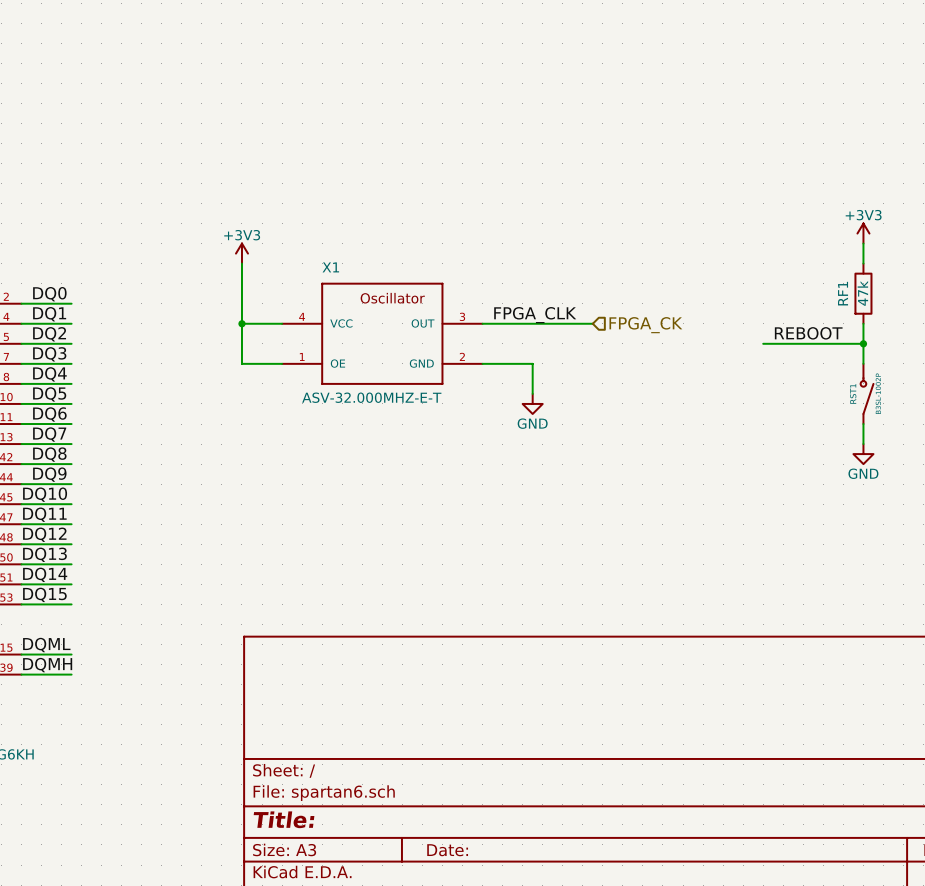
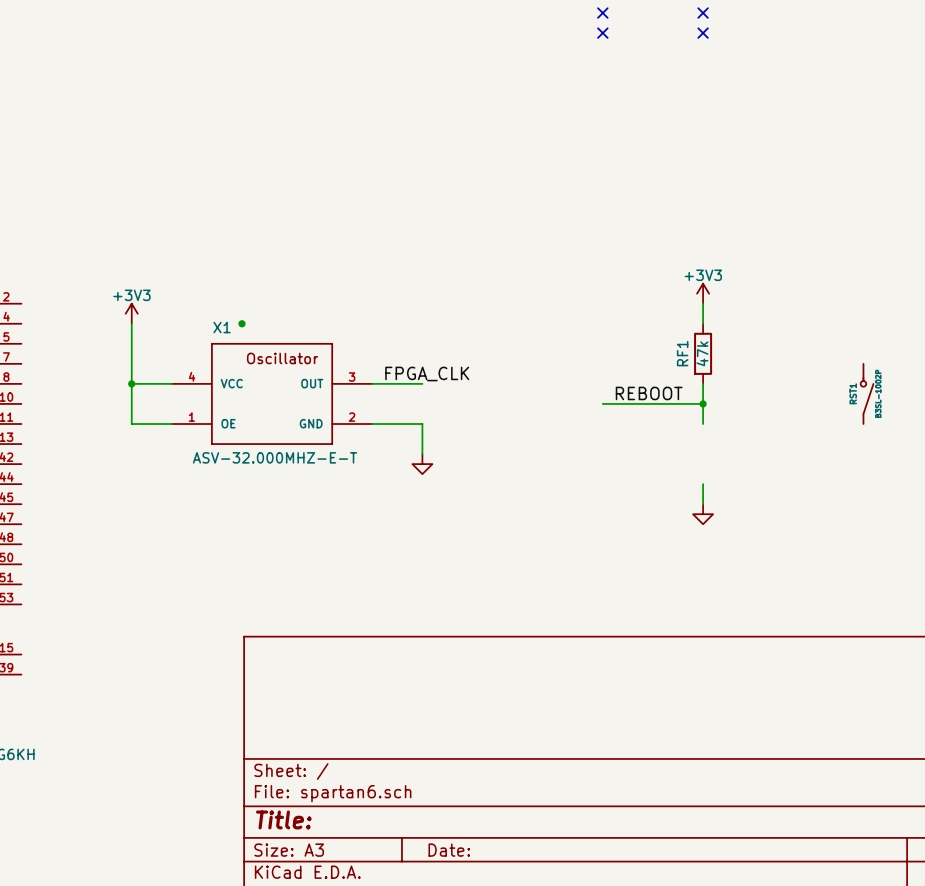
no-connect mark: none -> (602, 13)
no-connect mark: none -> (703, 13)
no-connect mark: none -> (602, 33)
no-connect mark: none -> (703, 33)
power symbol position: +3V3 (863, 233) -> +3V3 (703, 293)
wire: (863, 243) (863, 263) -> (703, 303) (703, 323)
power symbol position: +3V3 (241, 253) -> +3V3 (131, 313)
wire: (241, 263) (241, 363) (282, 363) -> (131, 323) (131, 424) (171, 424)
RF1 position: (863, 293) -> (703, 353)
label: DQ0 (49, 294) -> none
wire: (21, 303) (71, 303) -> none
label: DQ1 (49, 314) -> none
label position: FPGA_CLK (535, 315) -> FPGA_CLK (427, 373)
wire: (21, 323) (71, 323) -> none
wire: (241, 323) (282, 323) -> (131, 383) (171, 383)
wire: (482, 323) (592, 323) -> none
wire: (863, 323) (863, 363) -> (703, 383) (703, 424)
hierarchical label: FPGA_CK (645, 325) -> none
X1 position: (382, 333) -> (272, 393)
label position: REBOOT (808, 333) -> REBOOT (649, 393)
label: DQ2 (49, 334) -> none
wire: (21, 343) (71, 343) -> none
wire: (763, 343) (863, 343) -> (602, 403) (703, 403)
junction: (863, 343) -> none
label: DQ3 (49, 354) -> none
wire: (21, 363) (71, 363) -> none
wire: (482, 363) (532, 363) (532, 393) -> (372, 424) (422, 424) (422, 454)
label: DQ4 (49, 374) -> none
wire: (21, 383) (71, 383) -> none
junction: none -> (131, 383)
label: DQ5 (49, 394) -> none
wire: (21, 403) (71, 403) -> none
power symbol: GND (532, 403) -> none
junction: none -> (703, 403)
label: DQ6 (49, 414) -> none
wire: (21, 424) (71, 424) -> none
wire: (863, 424) (863, 444) -> (703, 484) (703, 504)
label: DQ7 (49, 434) -> none
wire: (21, 444) (71, 444) -> none
label: DQ8 (49, 454) -> none
power symbol: GND (863, 454) -> none
wire: (21, 464) (71, 464) -> none
power symbol: none -> (422, 464)
label: DQ9 (49, 474) -> none
wire: (21, 484) (71, 484) -> none
label: DQ10 (45, 494) -> none
wire: (21, 504) (71, 504) -> none
label: DQ11 (44, 514) -> none
power symbol: none -> (703, 514)
wire: (21, 524) (71, 524) -> none
label: DQ12 (44, 534) -> none
wire: (21, 544) (71, 544) -> none
label: DQ13 (44, 554) -> none
wire: (21, 564) (71, 564) -> none
label: DQ14 (45, 574) -> none
wire: (21, 584) (71, 584) -> none
label: DQ15 (44, 594) -> none
wire: (21, 604) (71, 604) -> none
label: DQML (46, 645) -> none
wire: (21, 654) (71, 654) -> none
label: DQMH (47, 665) -> none
wire: (21, 674) (71, 674) -> none

